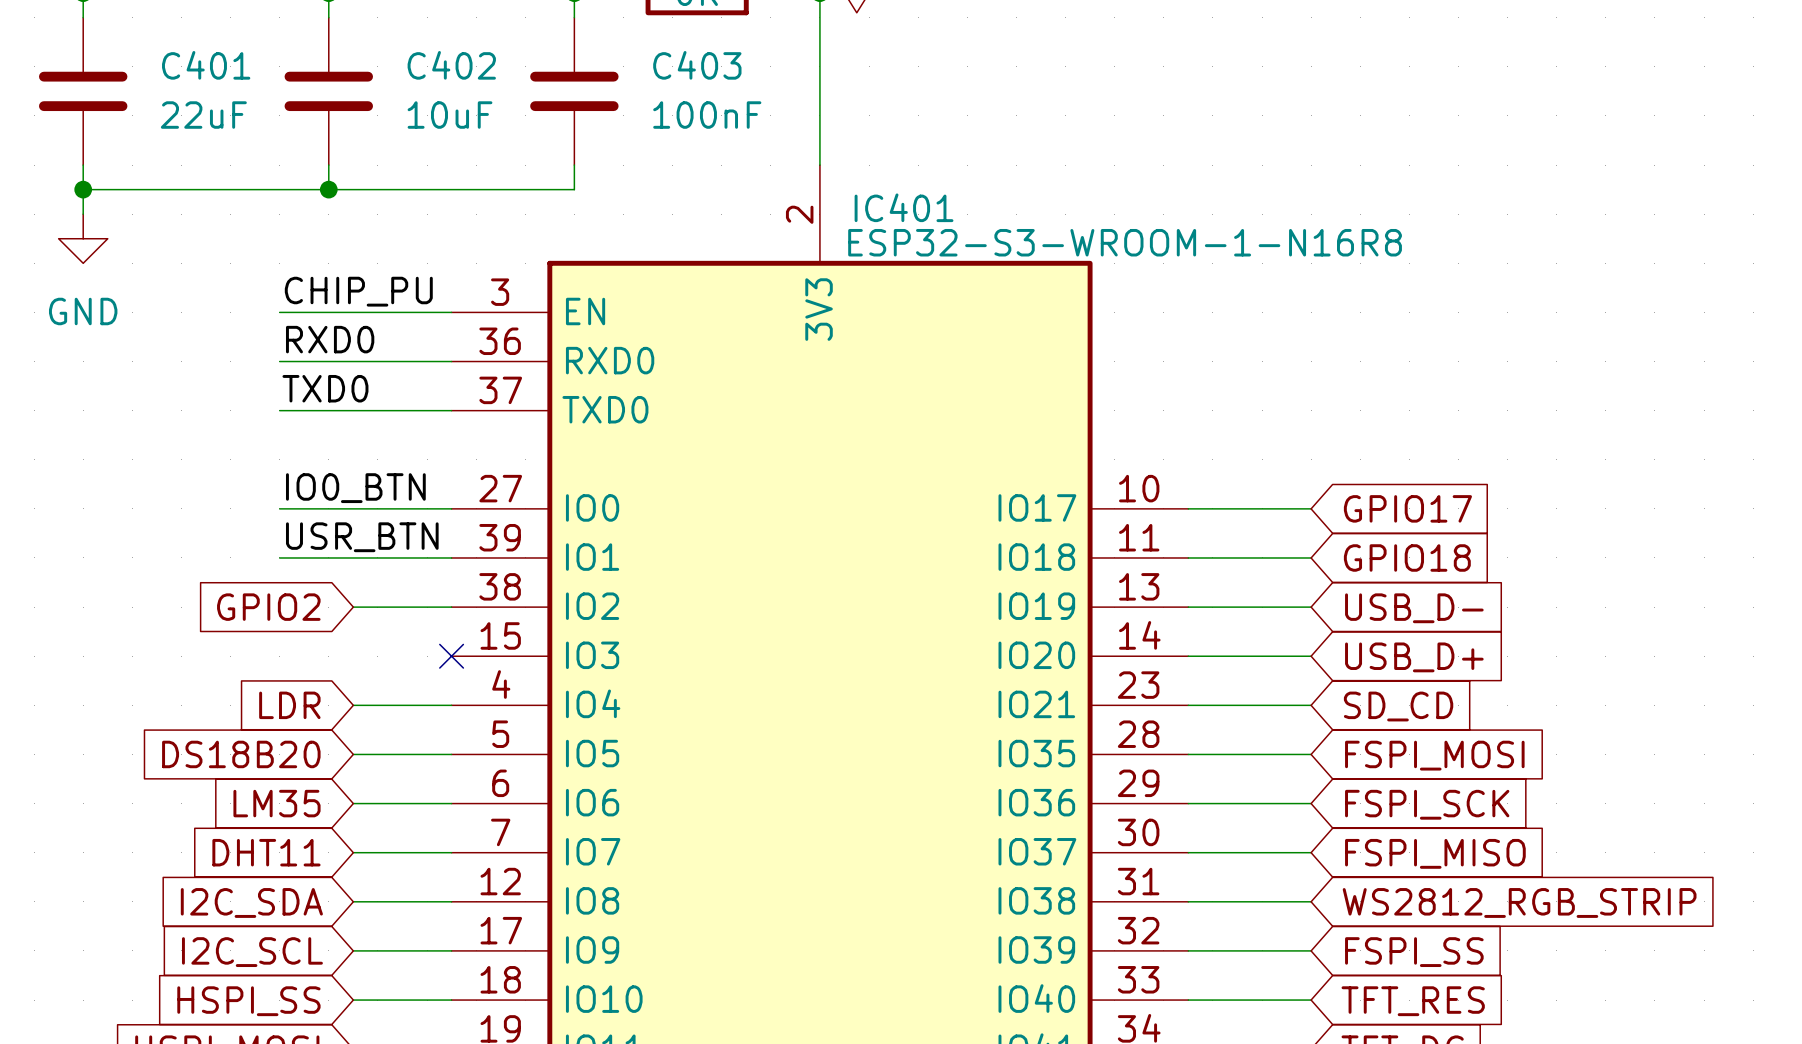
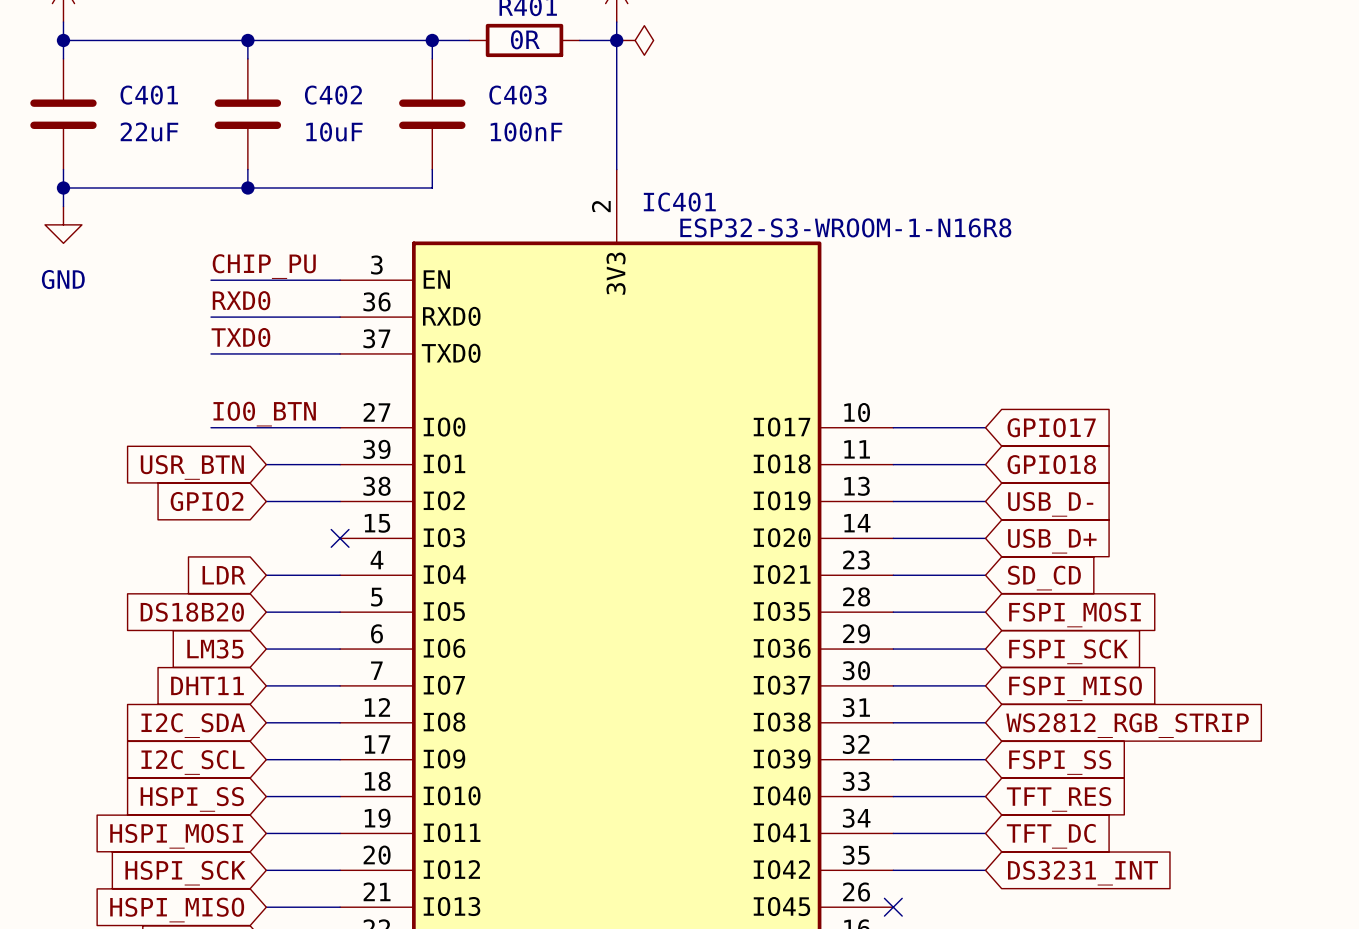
label: USR_BTN (362, 537) -> none
wire: (279, 557) (353, 557) -> none
global label: none -> USR_BTN (192, 467)

